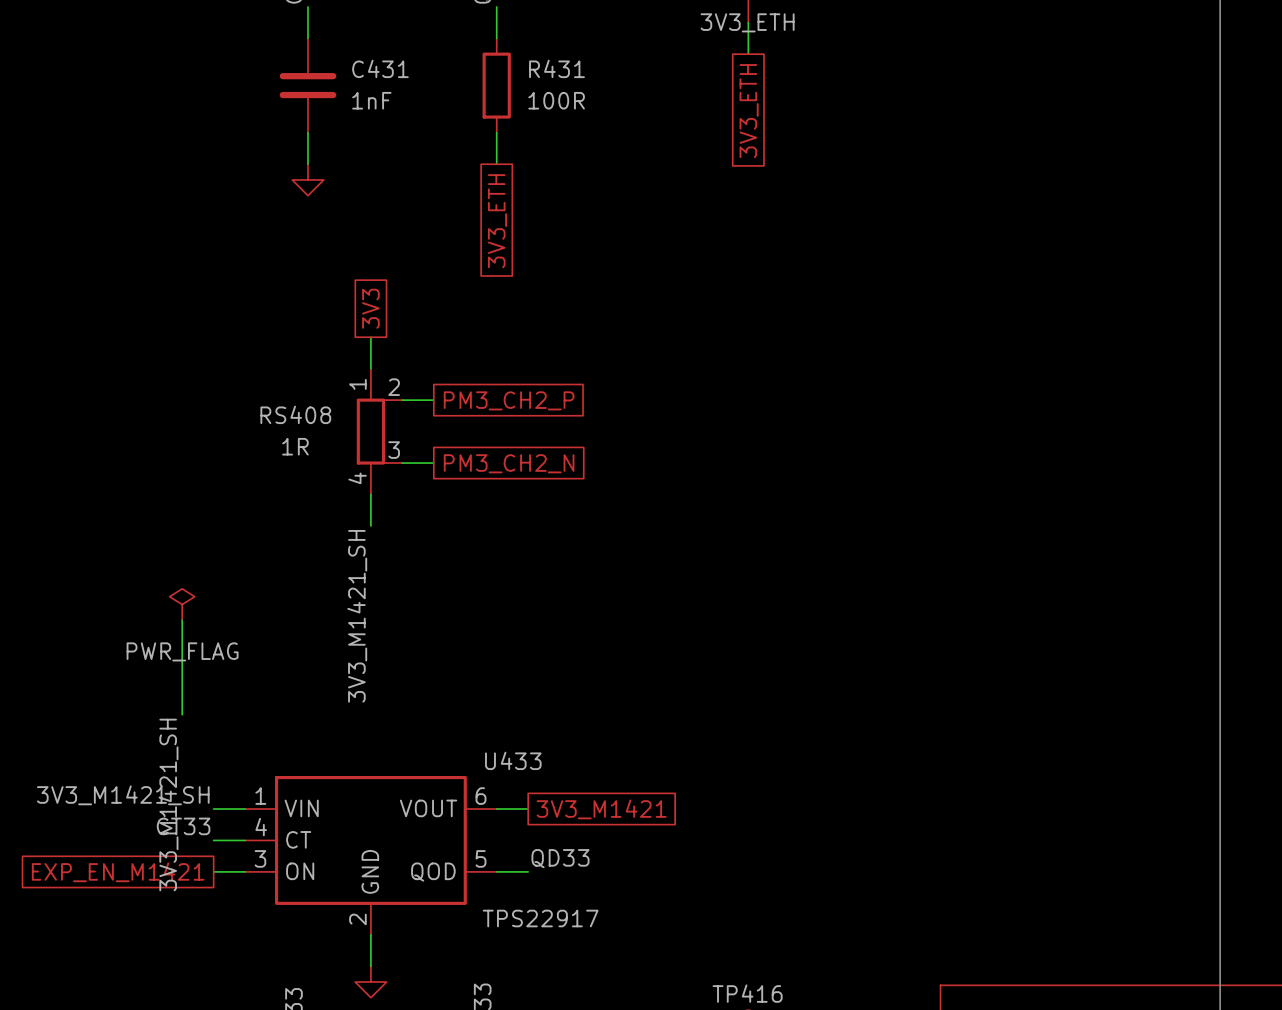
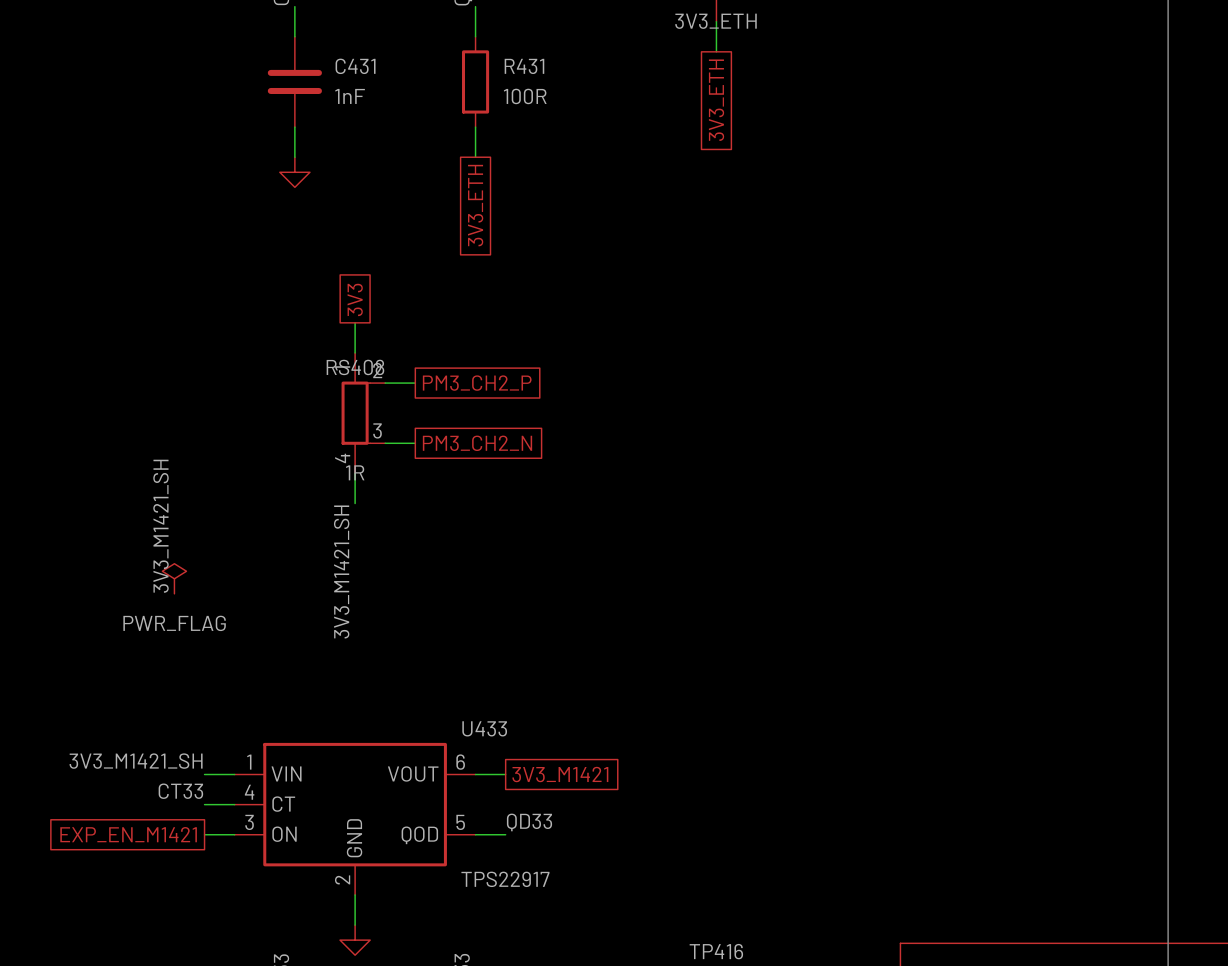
RS408 name position: RS408 (295, 414) -> RS408 (355, 367)
RS408 value position: 1R (295, 446) -> 1R (355, 472)
wire: (182, 620) (182, 714) -> none
label position: 3V3_M1421_SH (168, 805) -> 3V3_M1421_SH (160, 526)

